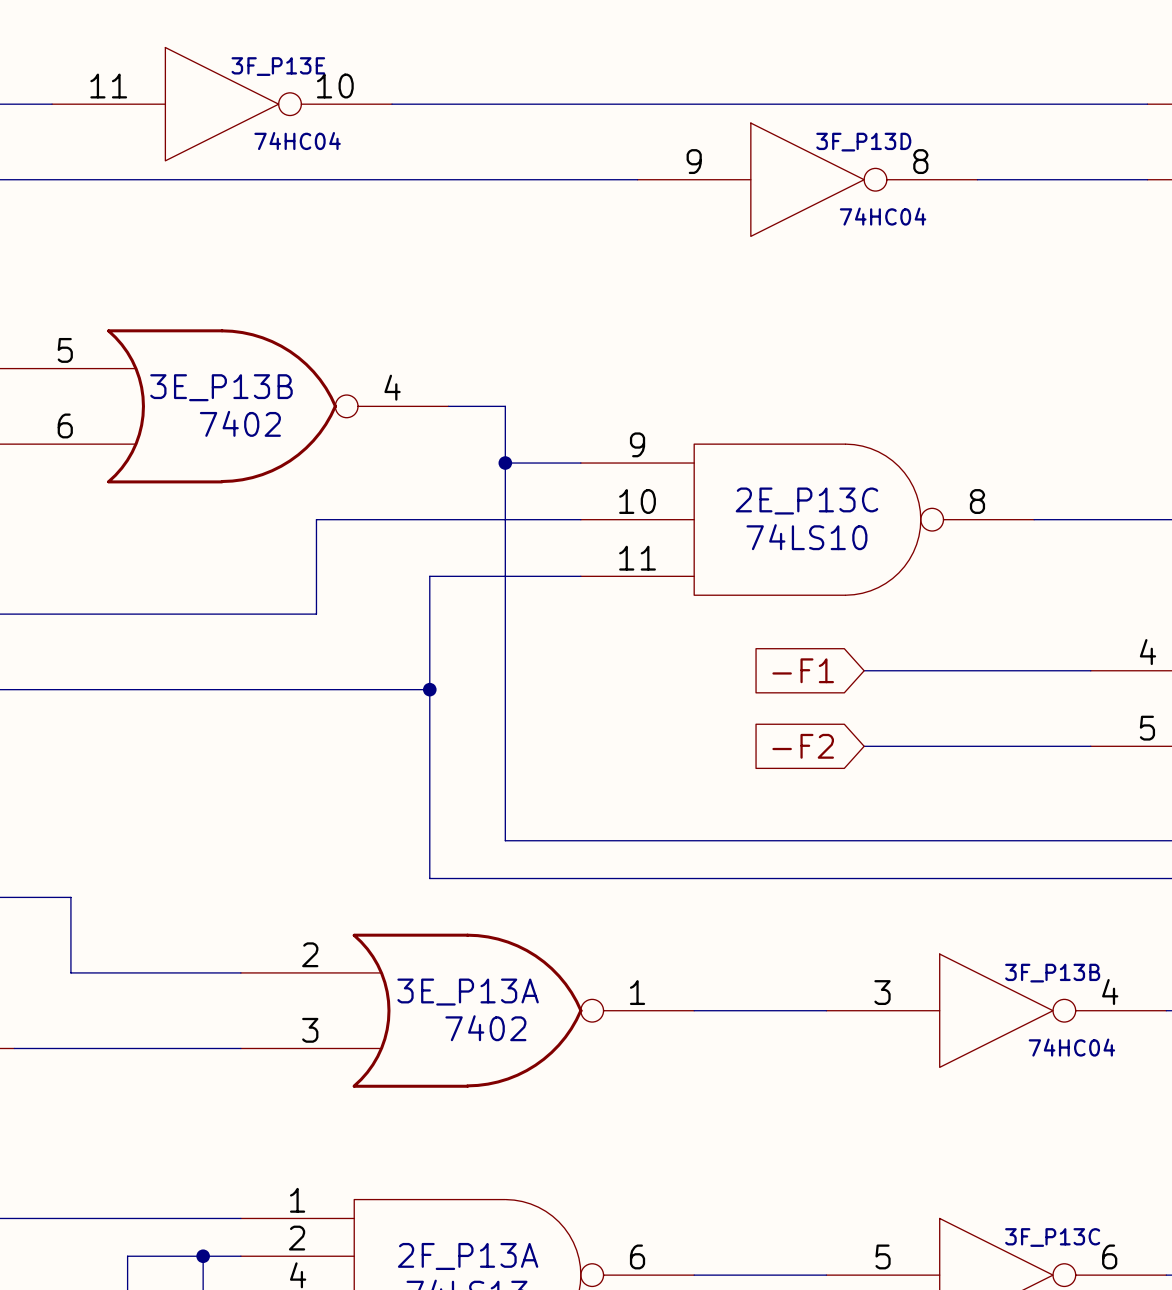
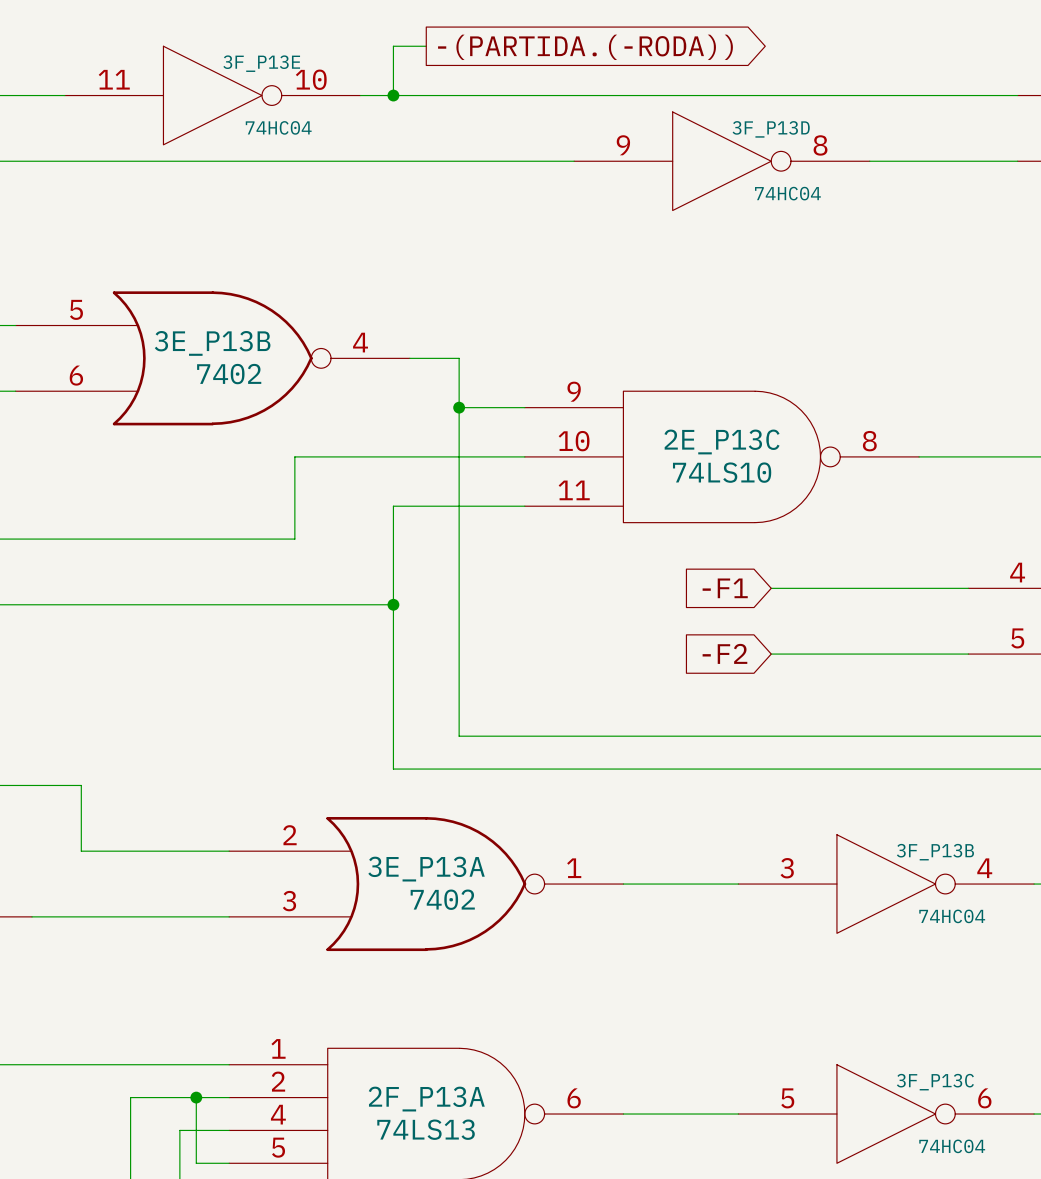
wire: none -> (426, 46) (393, 46) (393, 95)
global label: none -> -(PARTIDA.(-RODA)) (585, 47)
junction: none -> (393, 95)

